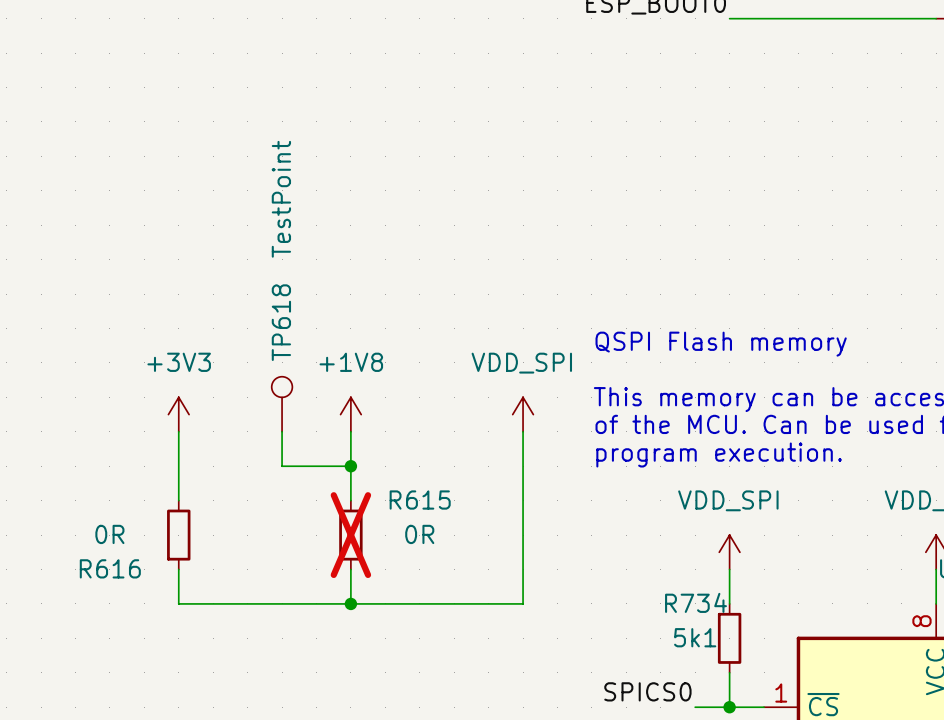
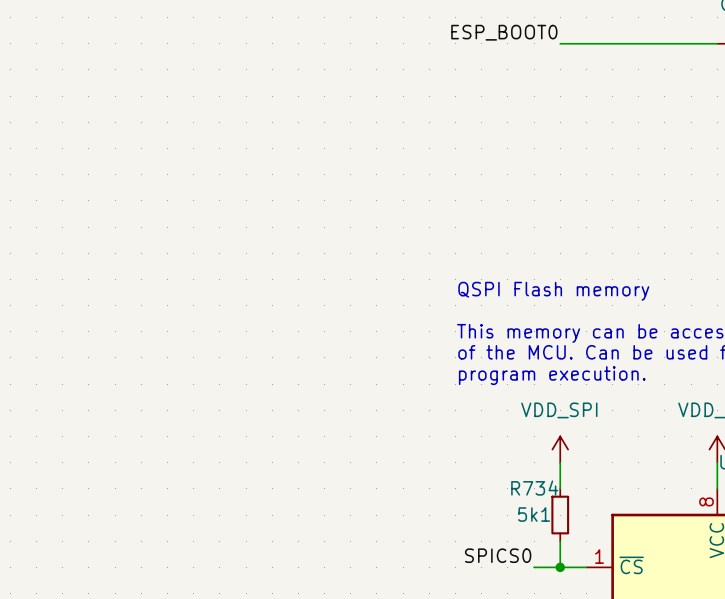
TP618: TestPoint (282, 404) -> none
power symbol: +3V3 (178, 414) -> none
power symbol: +1V8 (350, 414) -> none
power symbol: VDD_SPI (523, 414) -> none
wire: (178, 431) (178, 500) -> none
wire: (282, 431) (282, 466) (350, 466) -> none
wire: (350, 431) (350, 500) -> none
wire: (523, 431) (523, 603) (178, 603) (178, 569) -> none
junction: (350, 466) -> none
R616: 0R (178, 535) -> none
R615: 0R (350, 535) -> none
wire: (350, 569) (350, 603) -> none
junction: (350, 603) -> none

